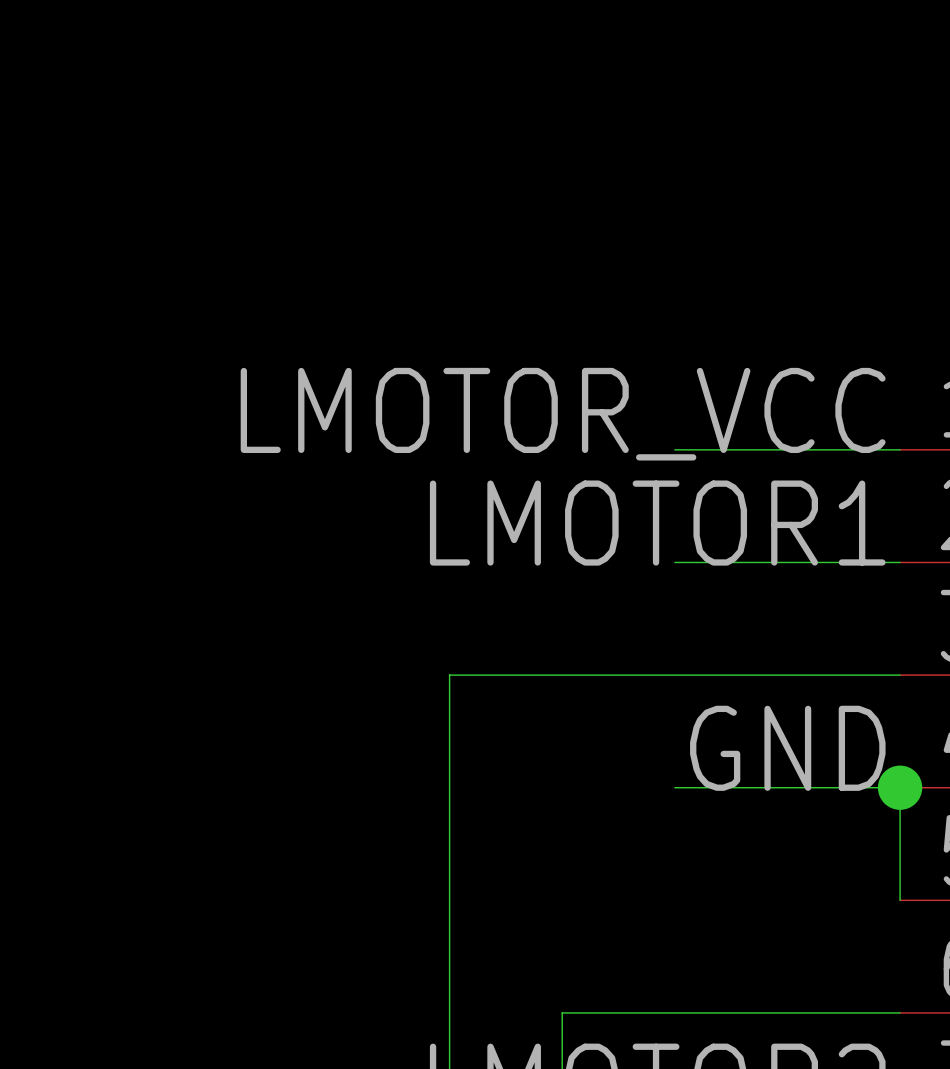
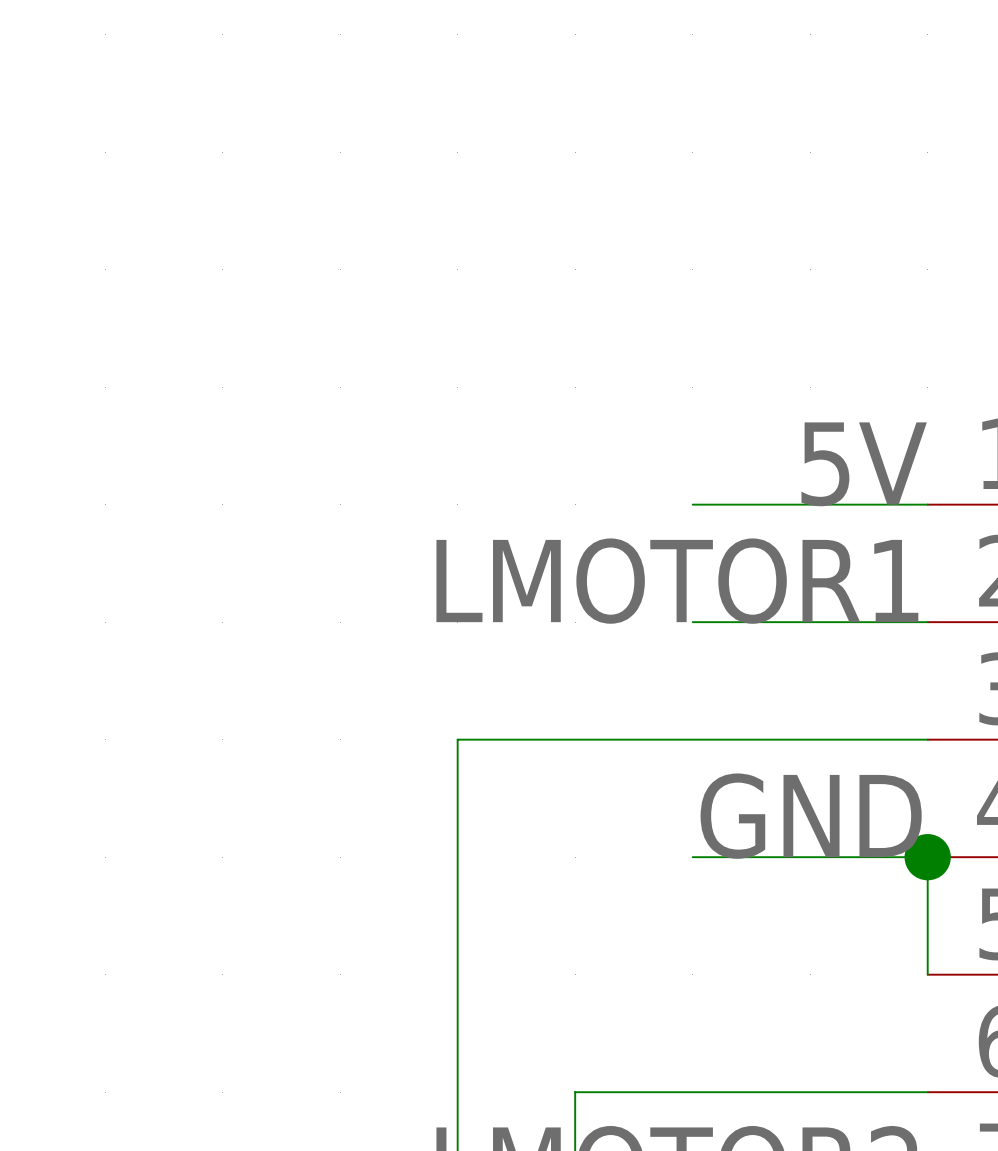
label: LMOTOR_VCC (563, 414) -> 5V (864, 464)

